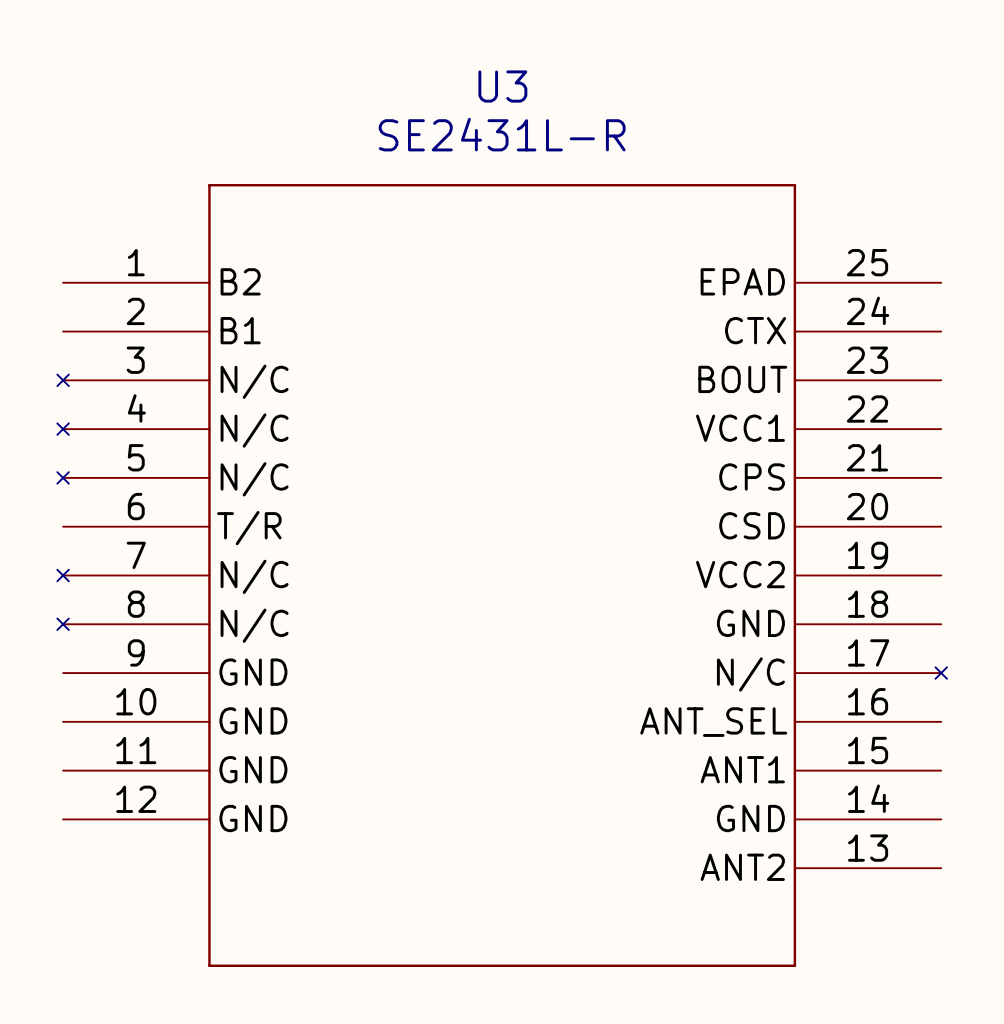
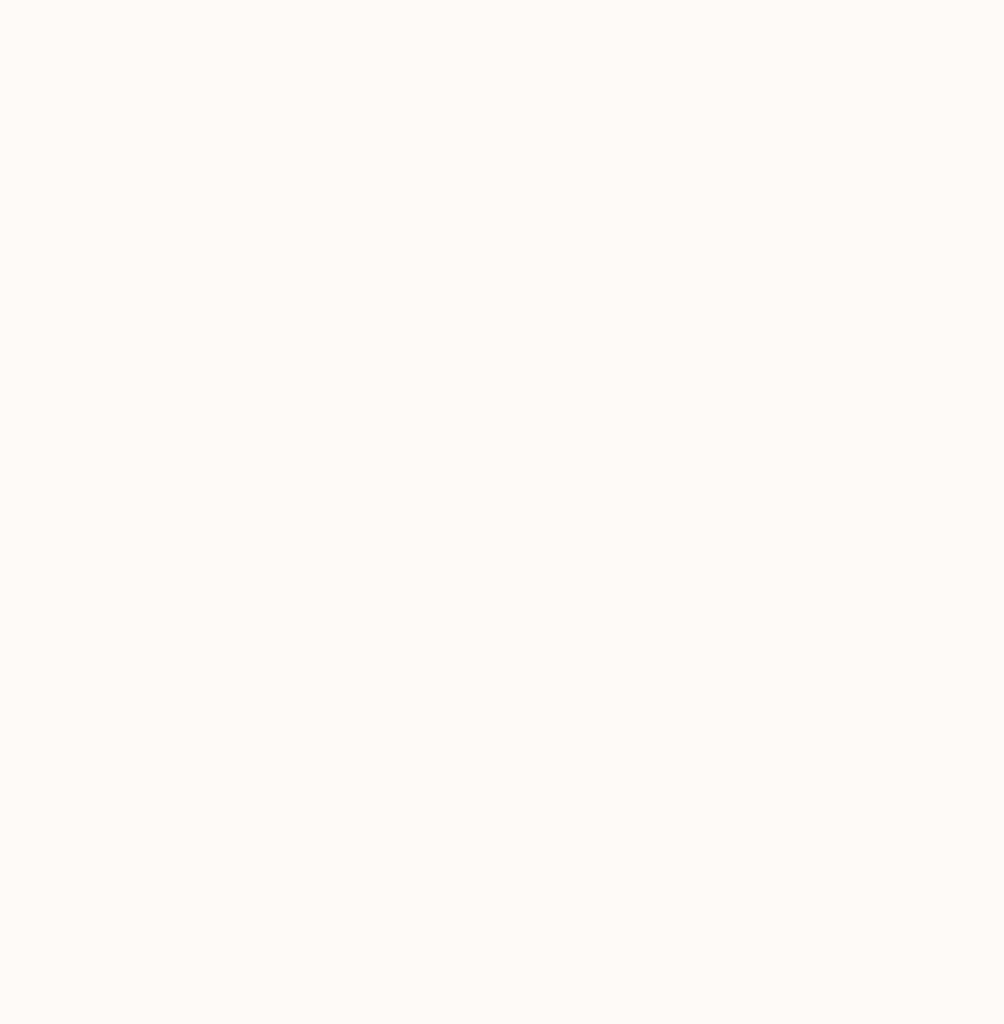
U3: SE2431L-R (502, 575) -> none

